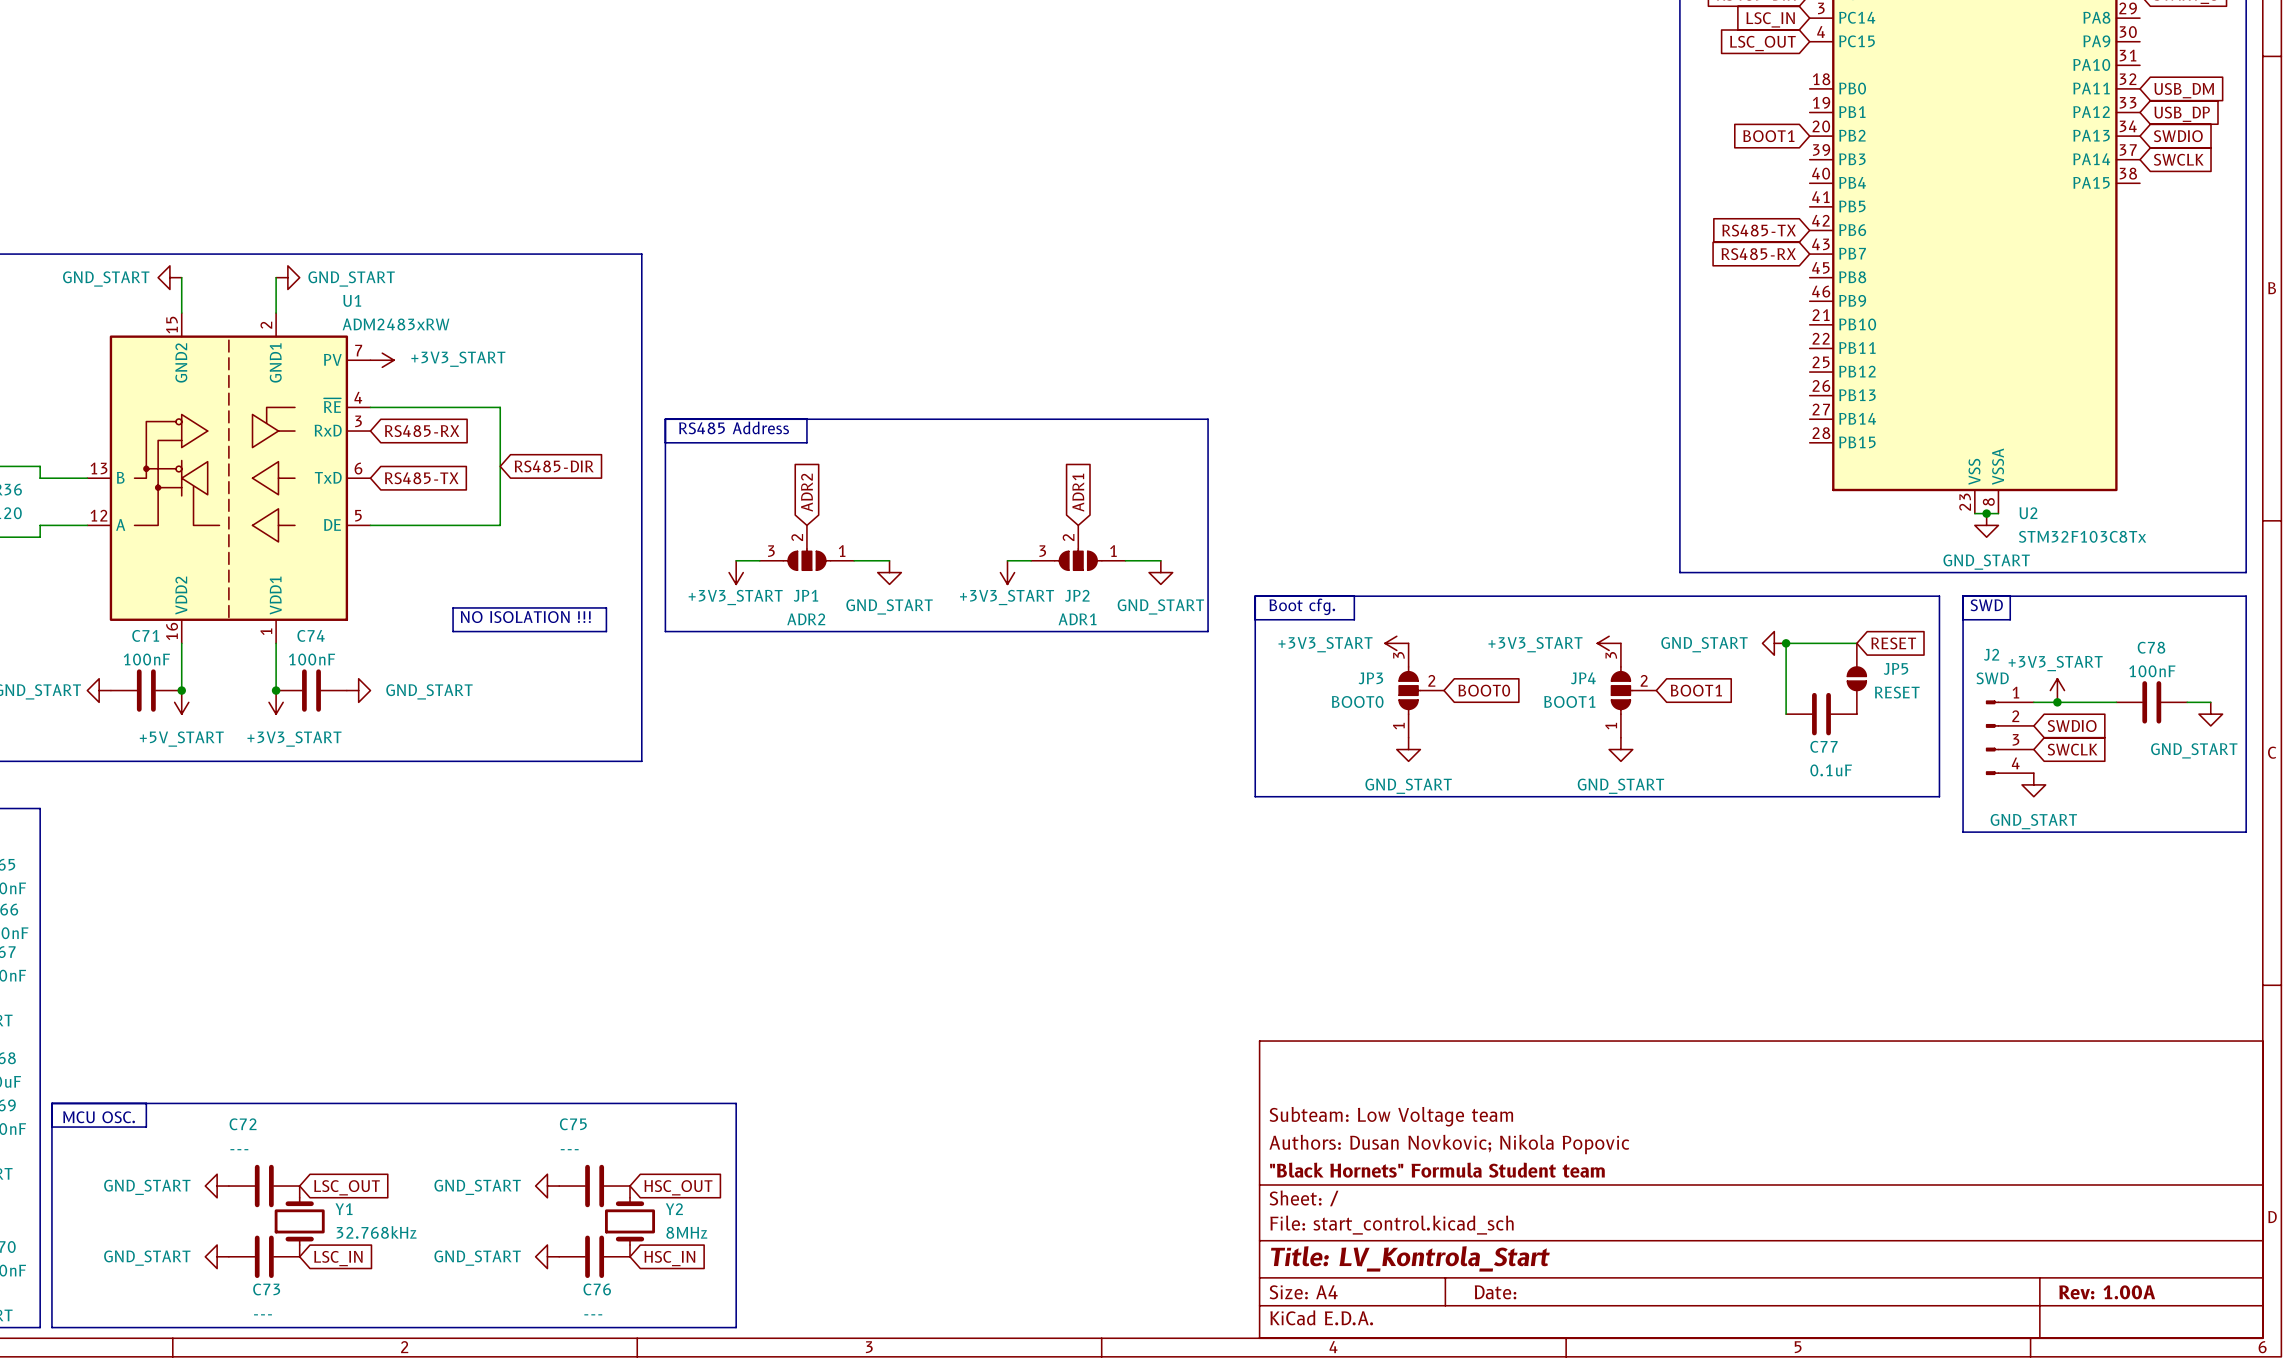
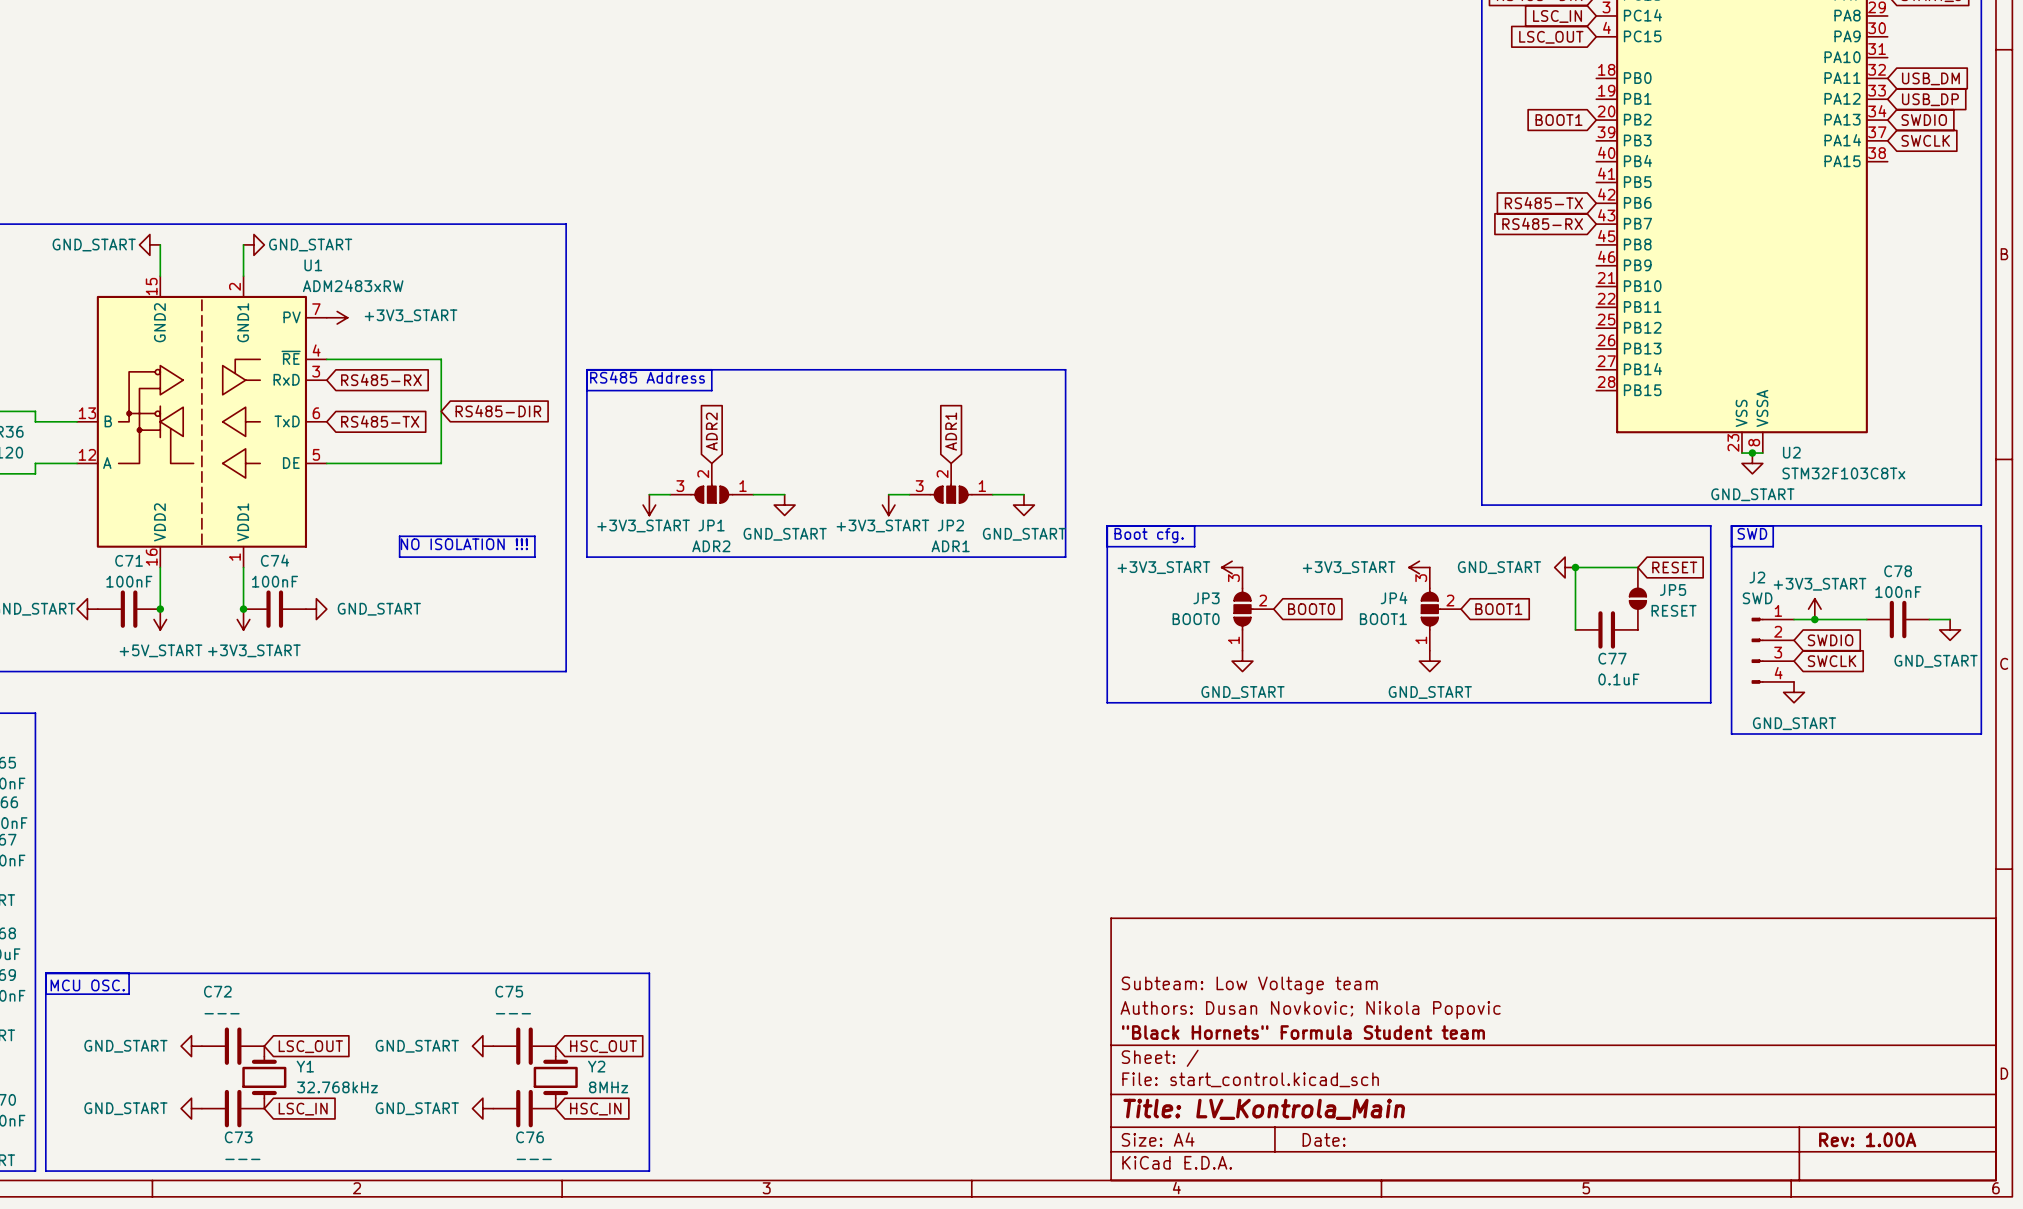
title block: Title: LV_Kontrola_Start (1410, 1258) -> Title: LV_Kontrola_Main (1264, 1109)

